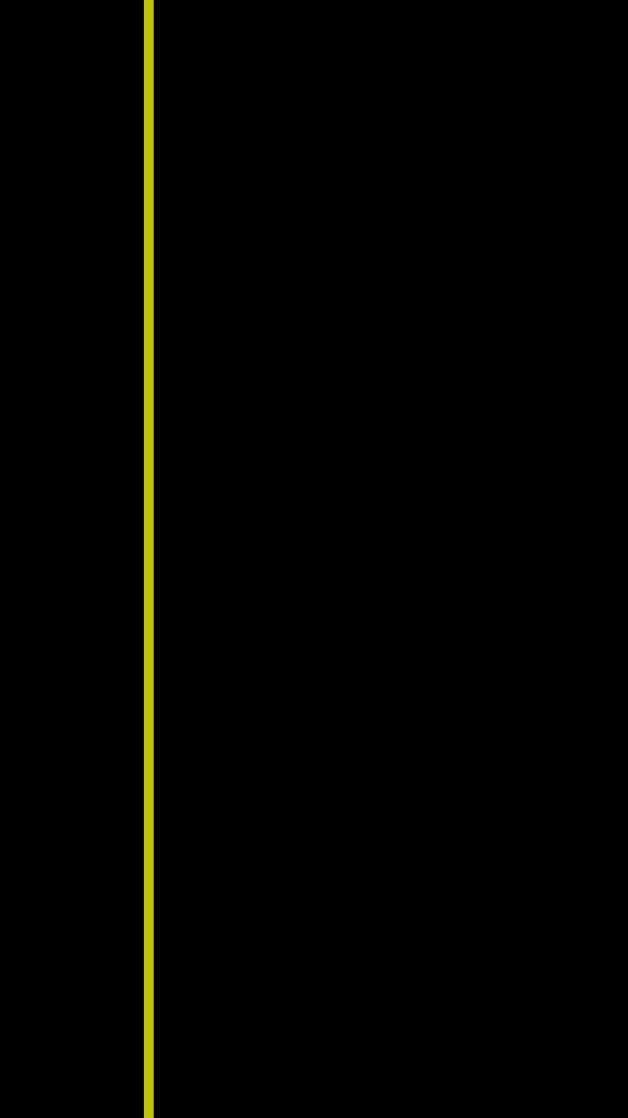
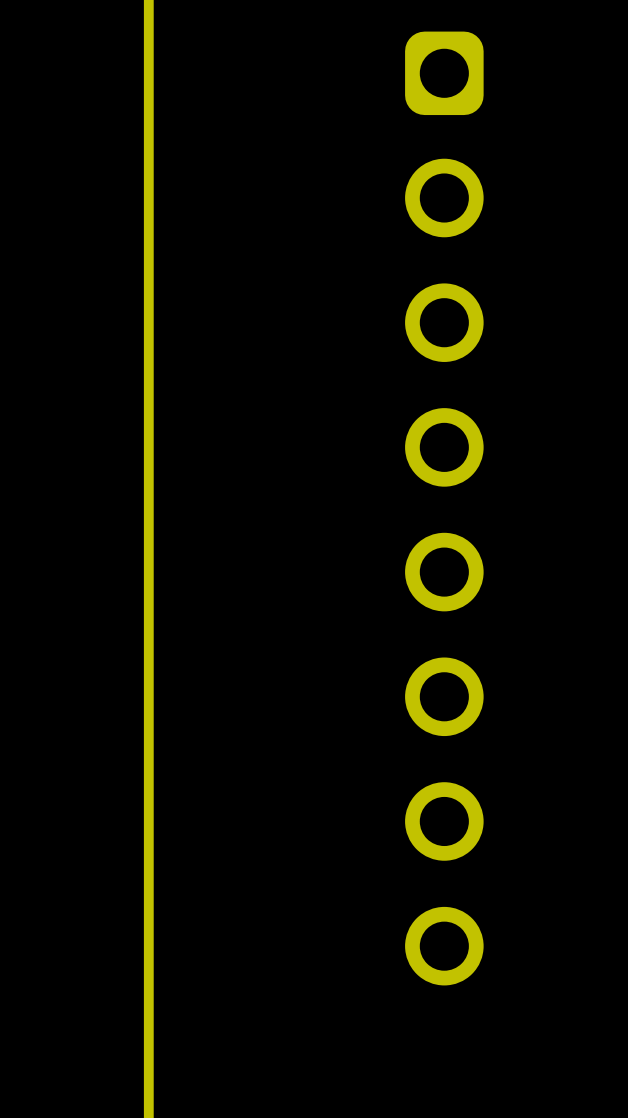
part: none -> (444, 508)

